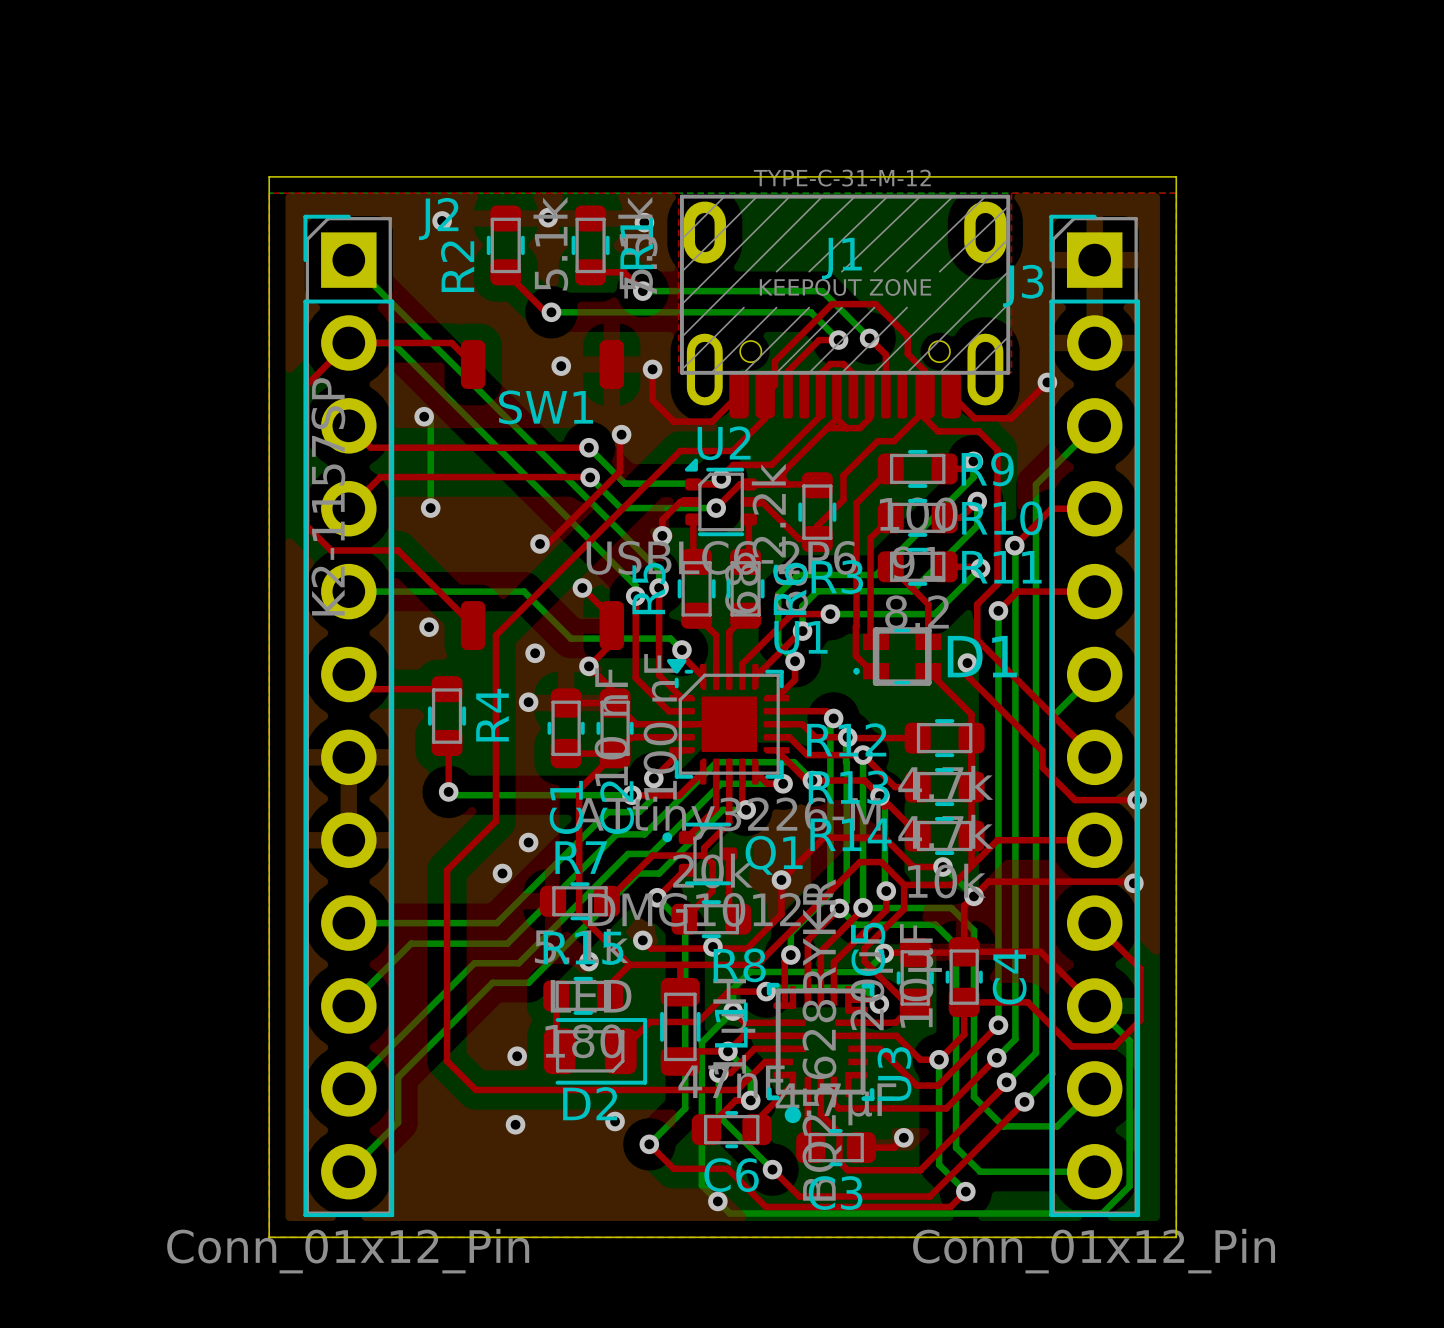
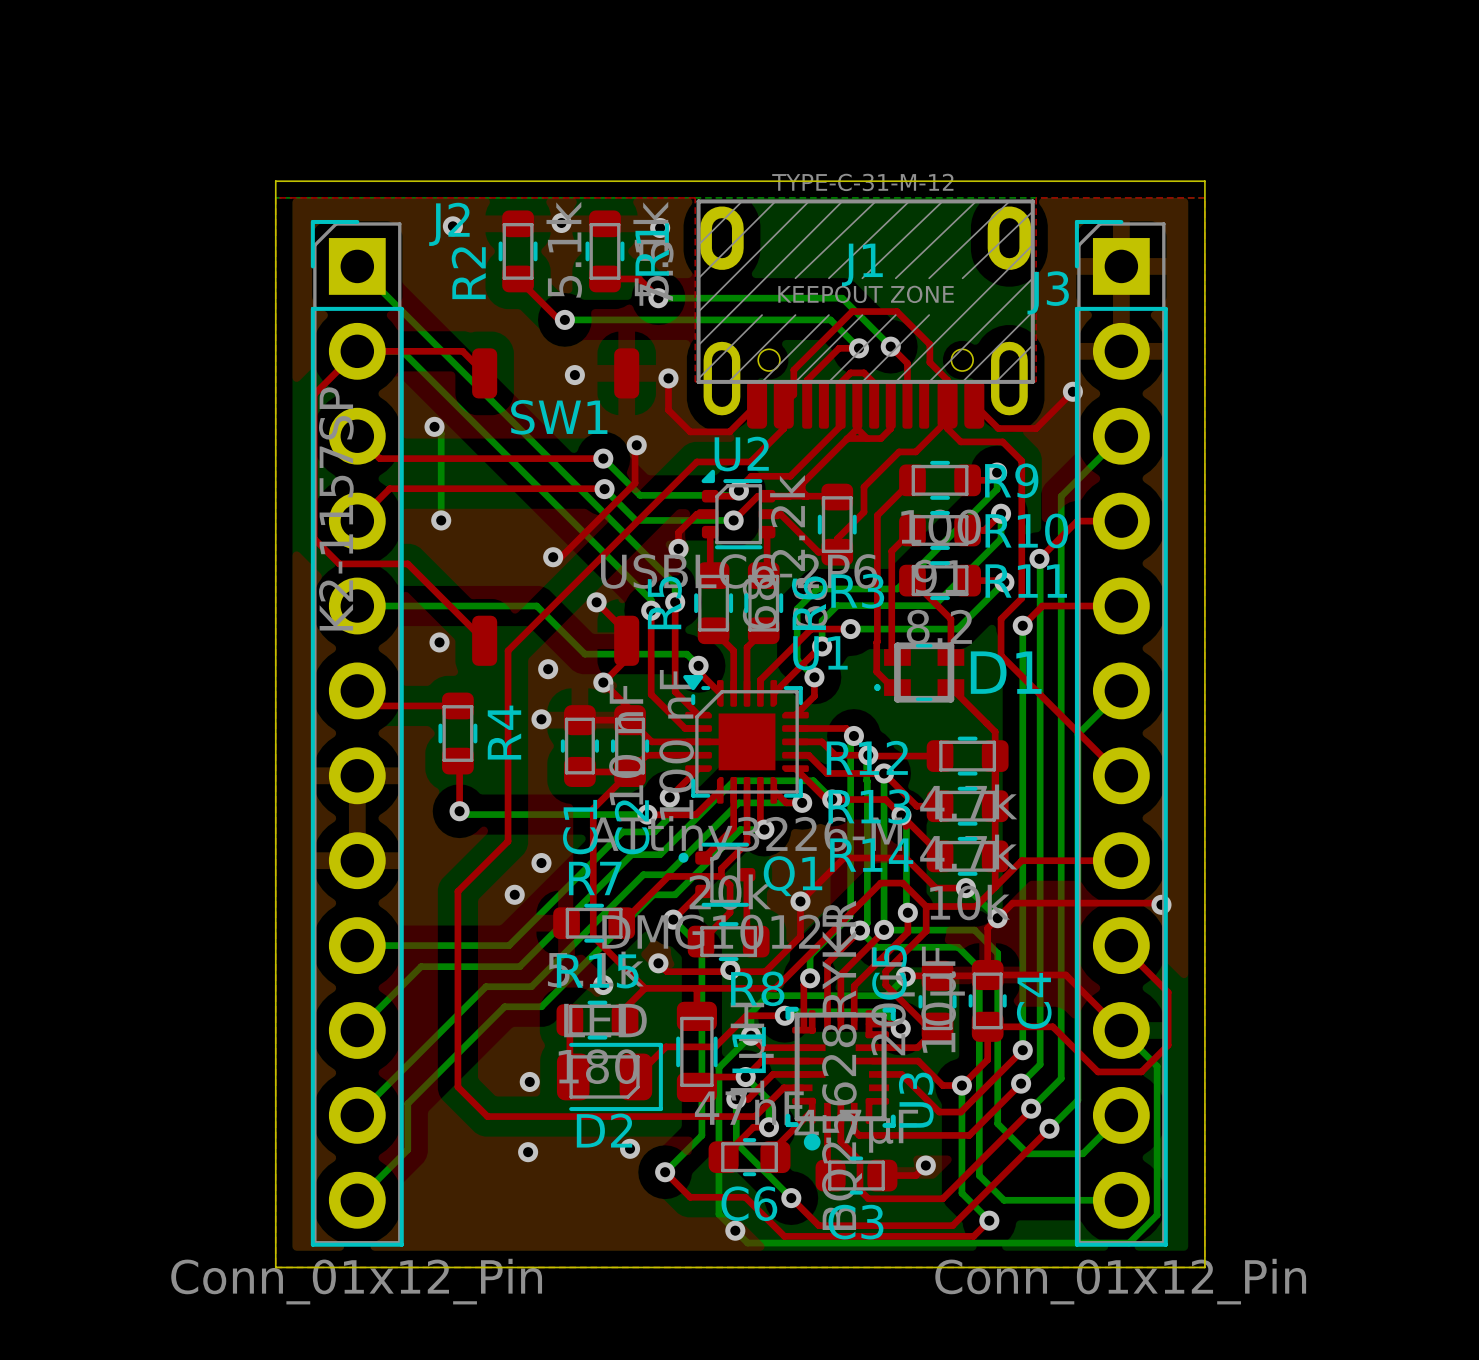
top track: (967, 663) (967, 676) (1042, 751) (1042, 767) (1075, 800) (1137, 800) -> none
via: (967, 663) -> none
via: (1137, 800) -> none

